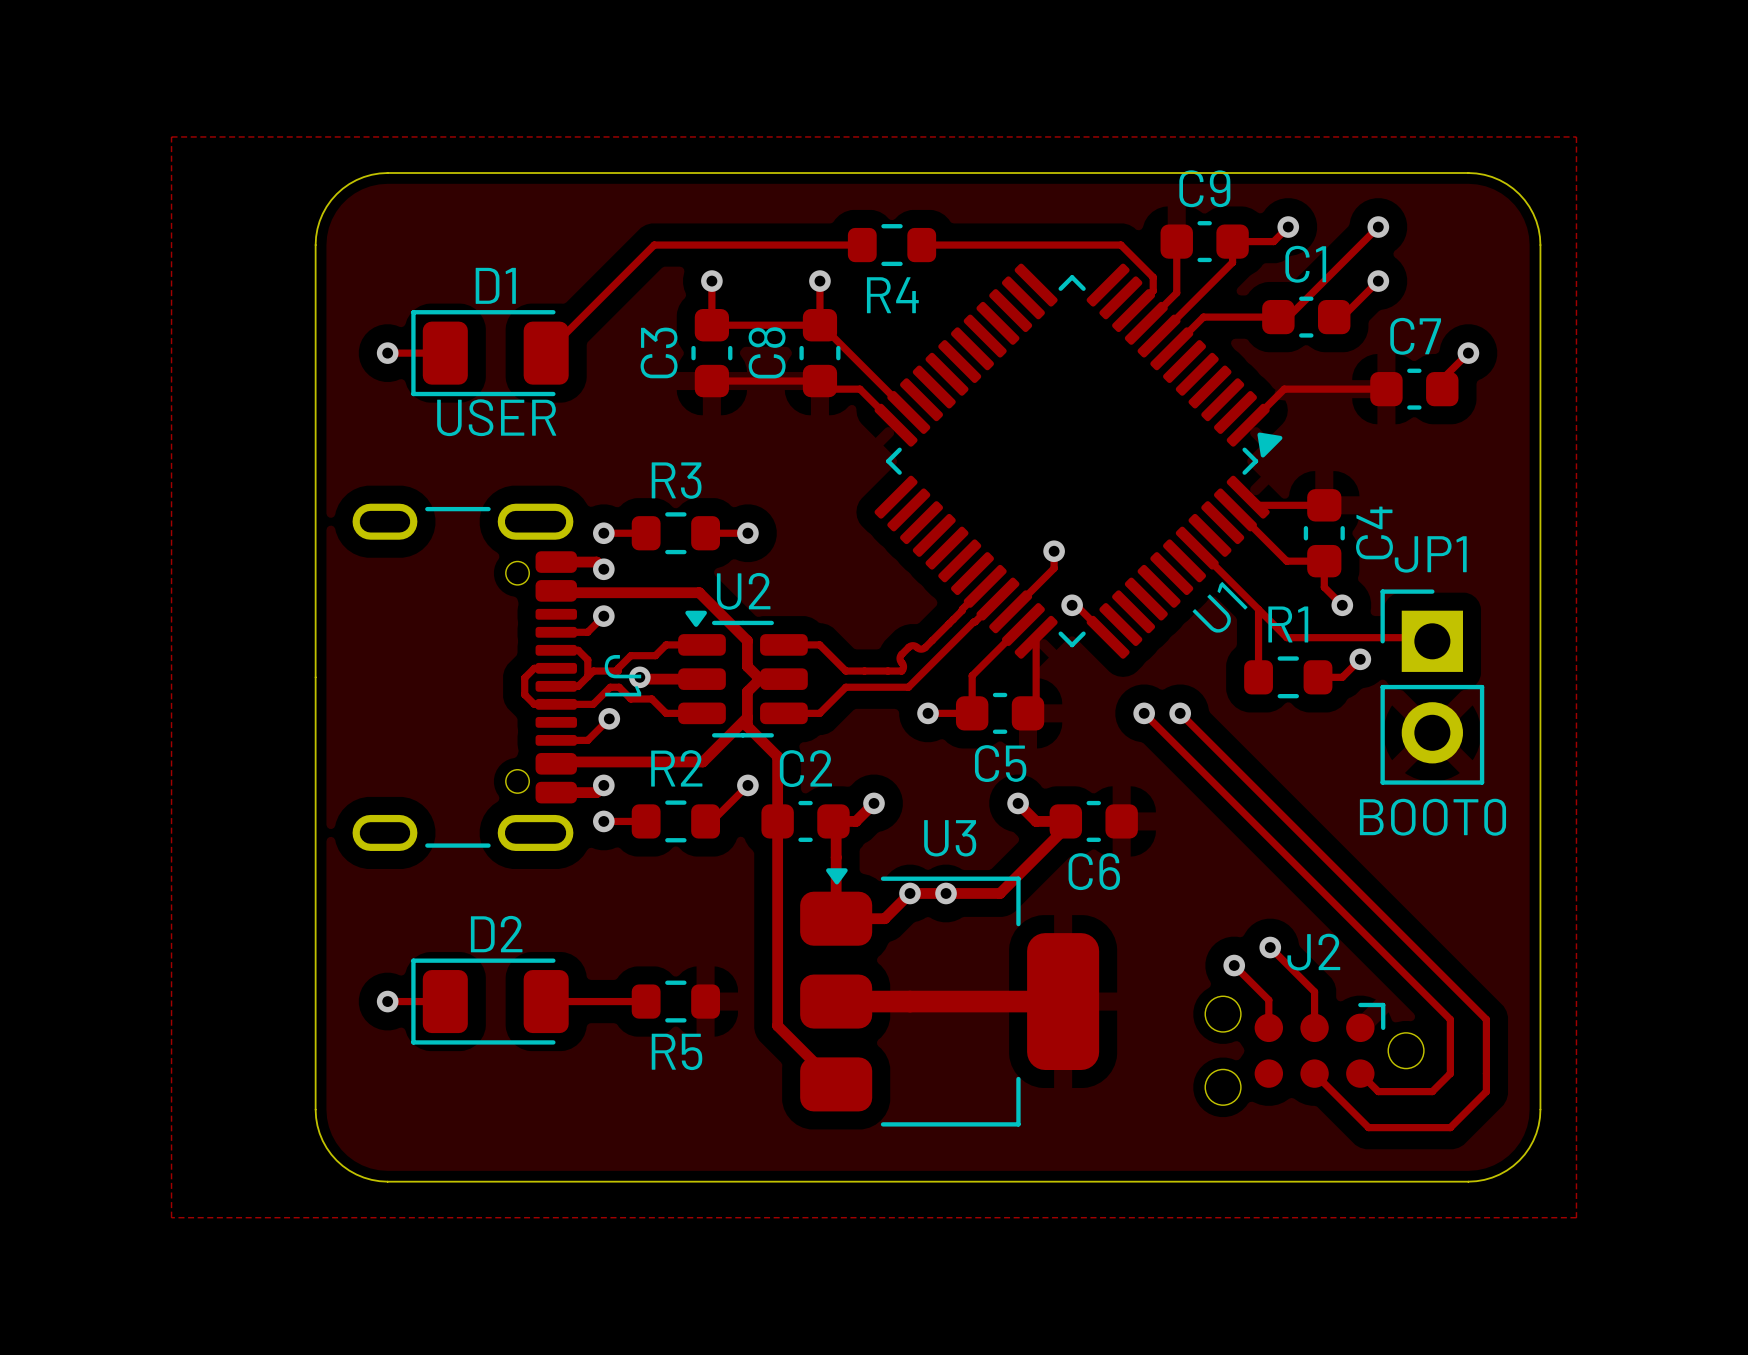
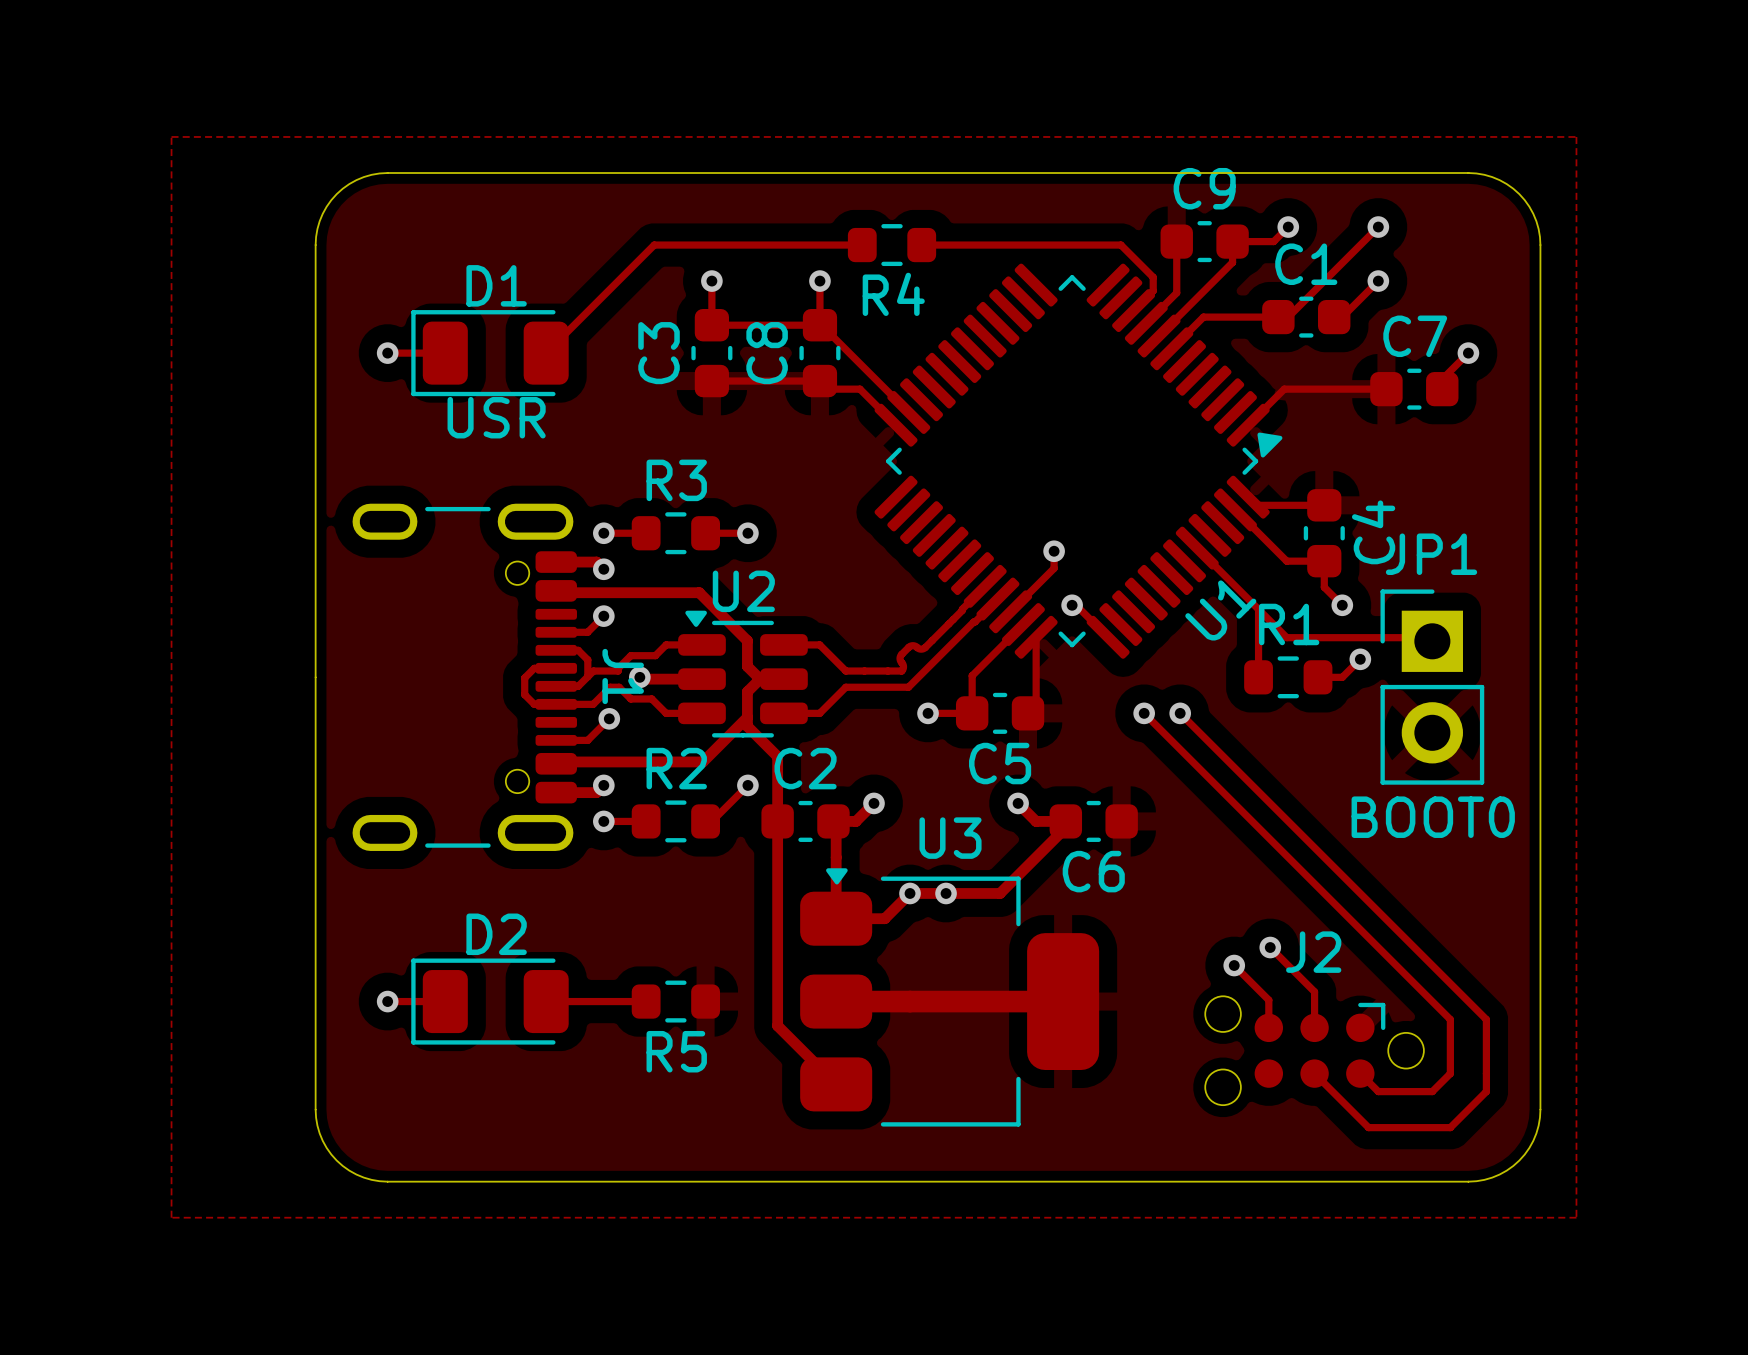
D1 value: USER (496, 417) -> USR (496, 417)

